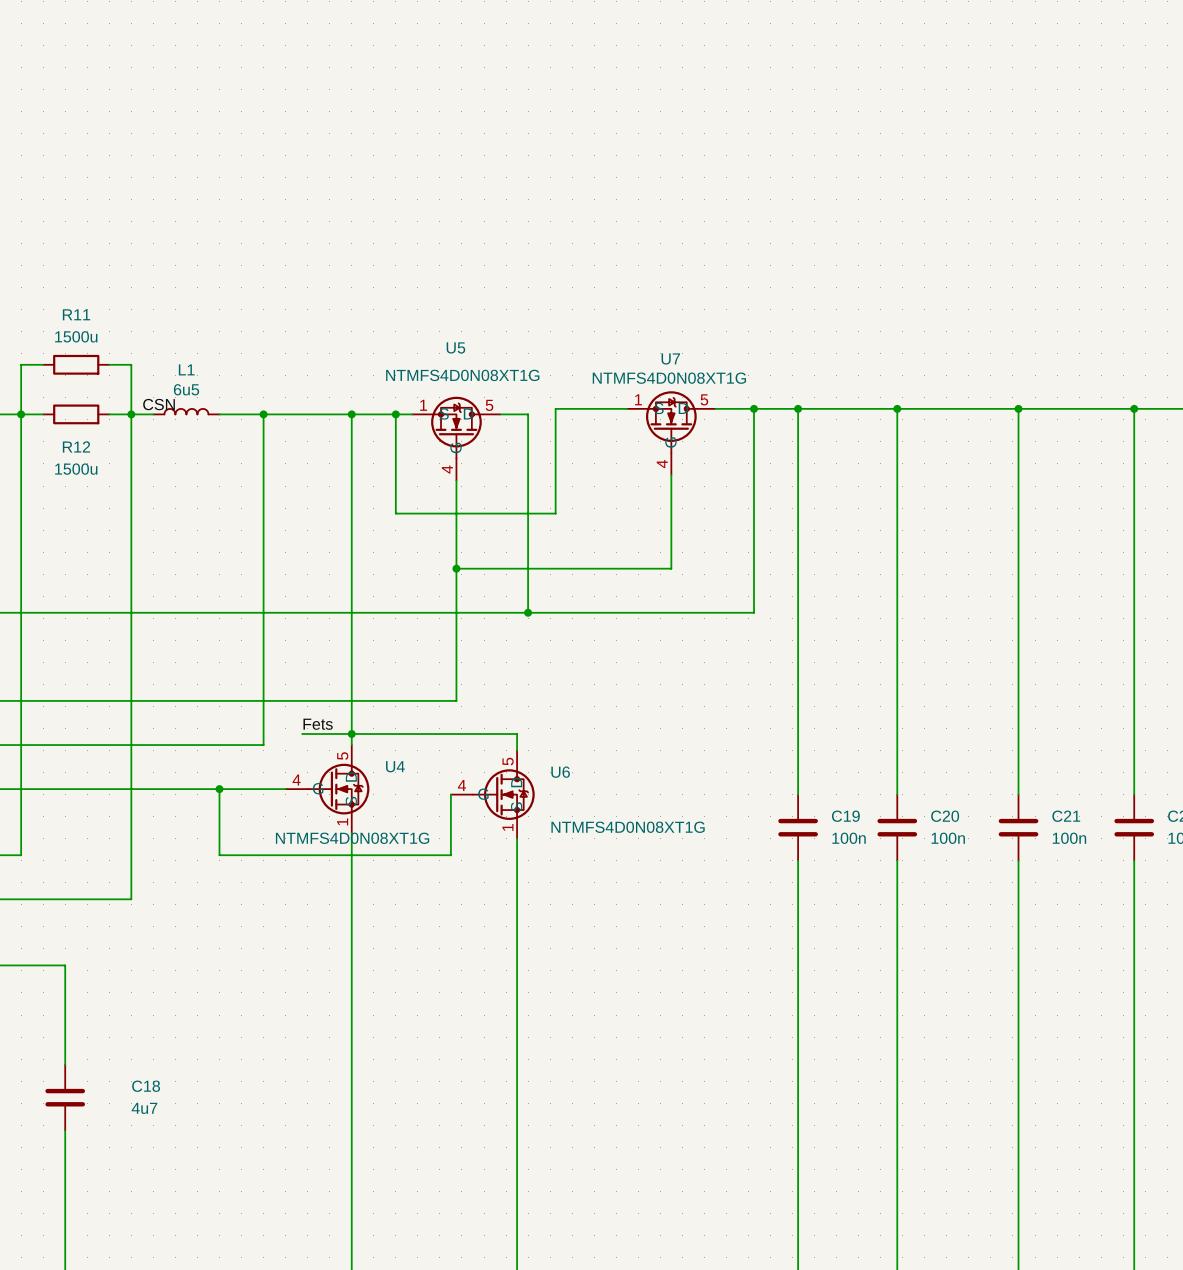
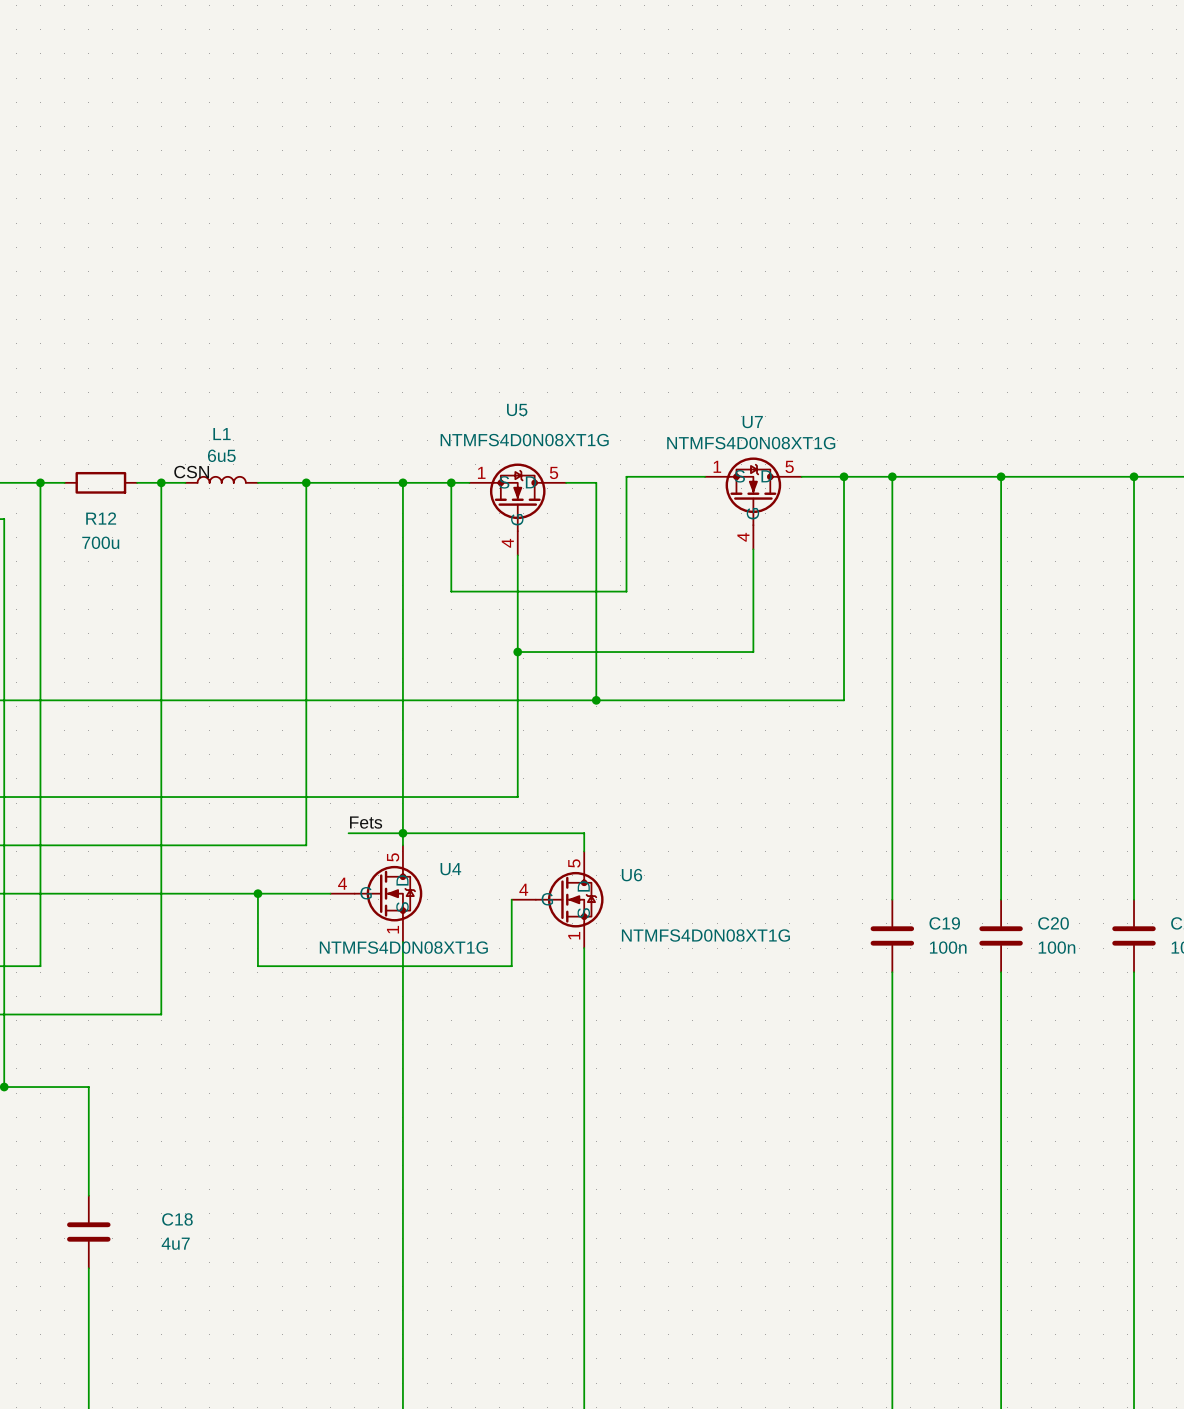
wire: (43, 364) (21, 364) (21, 414) -> none
R11: 1500u (76, 364) -> none
wire: (109, 364) (131, 364) (131, 414) -> none
R12 value: 1500u (76, 469) -> 700u (100, 542)

